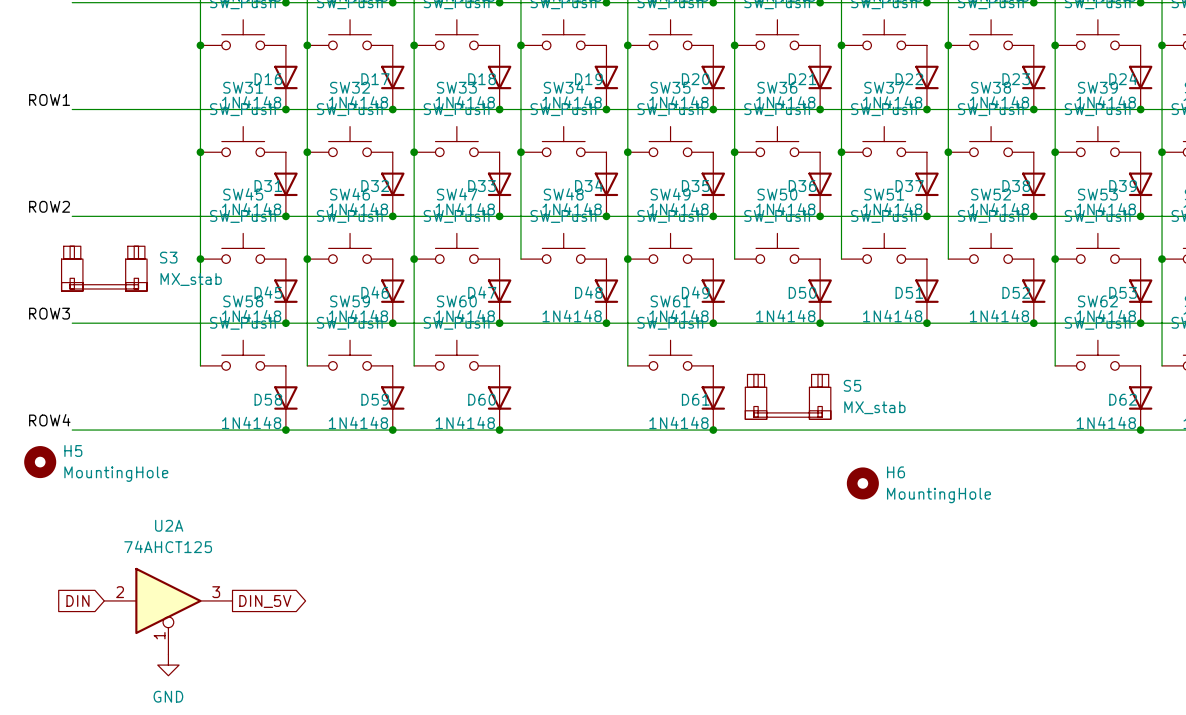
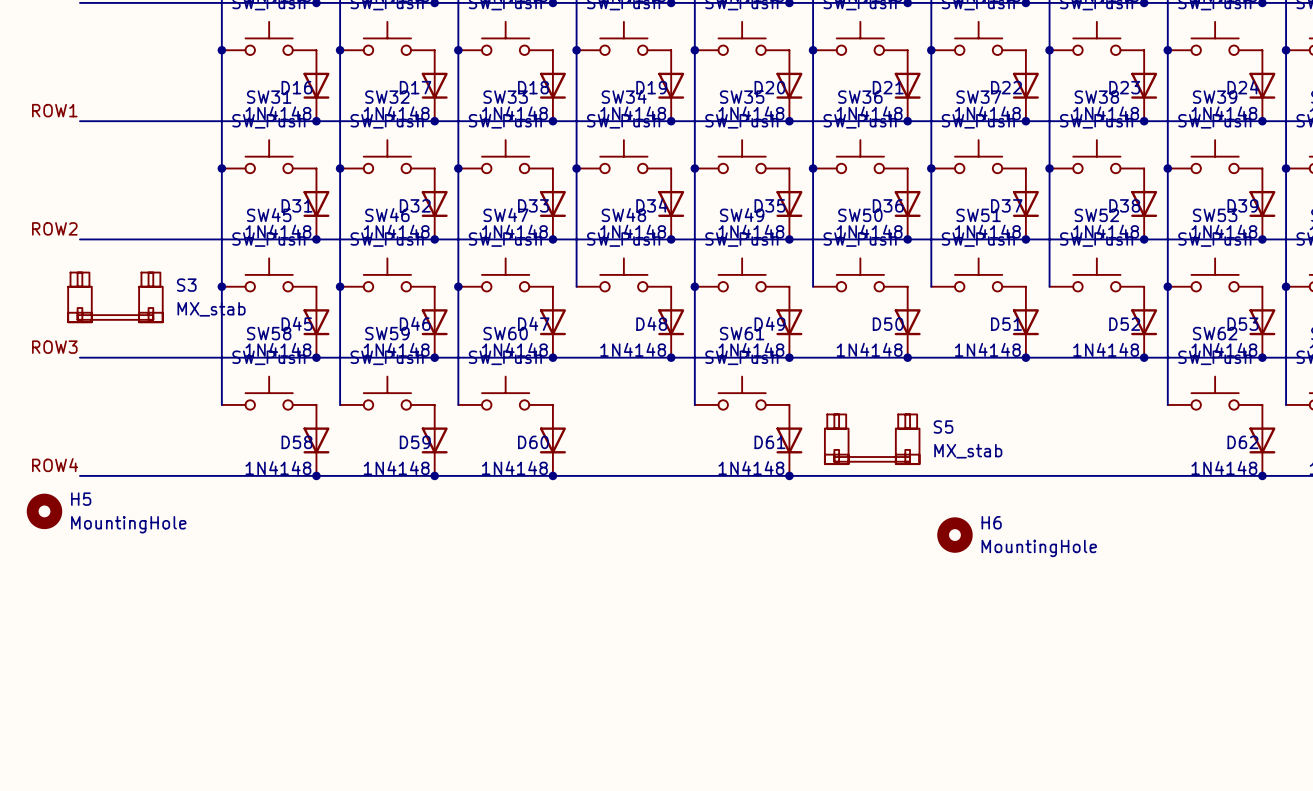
global label: DIN (77, 600) -> none
global label: DIN_5V (265, 601) -> none
U2A: 74AHCT125 (168, 611) -> none
power symbol: GND (168, 665) -> none

